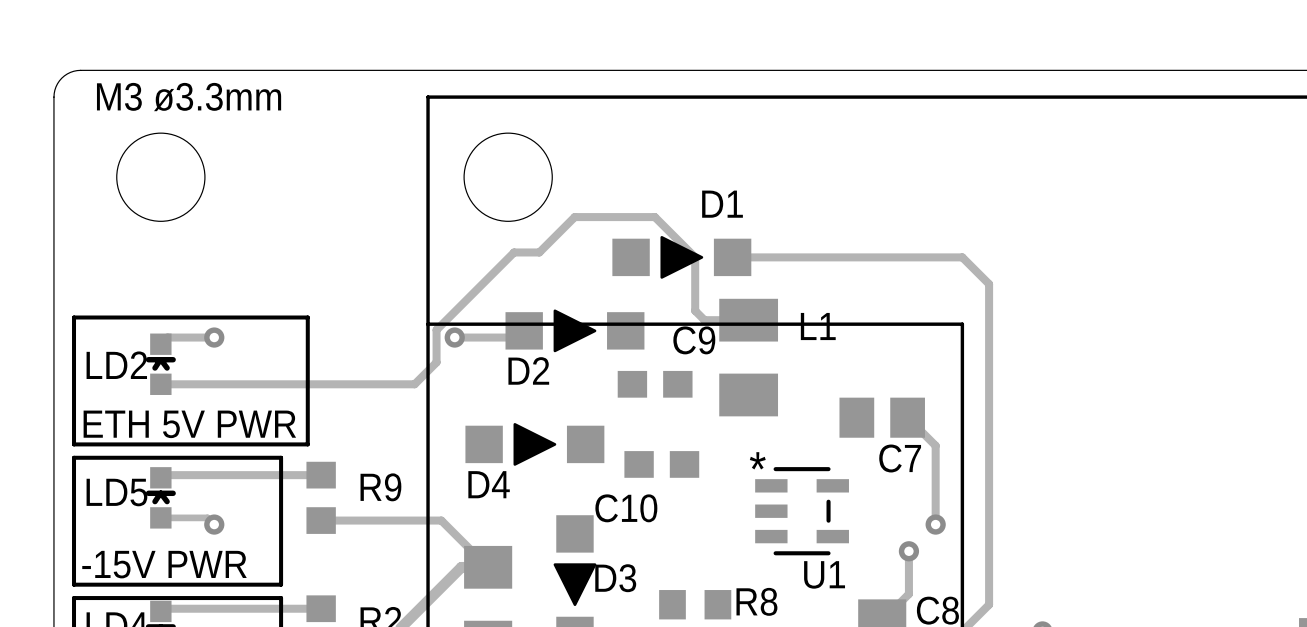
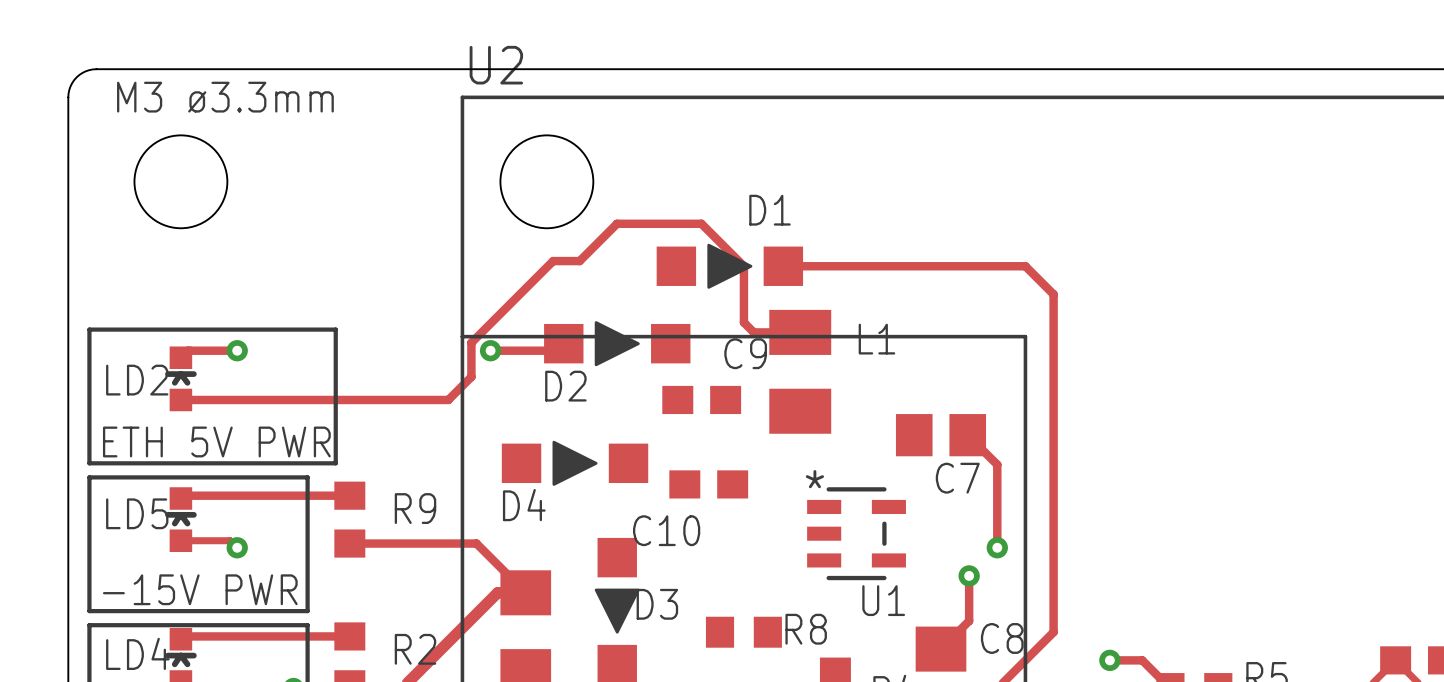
U2 name: none -> U2 (496, 65)

